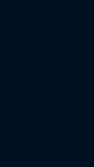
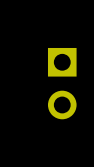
part: none -> (62, 83)

